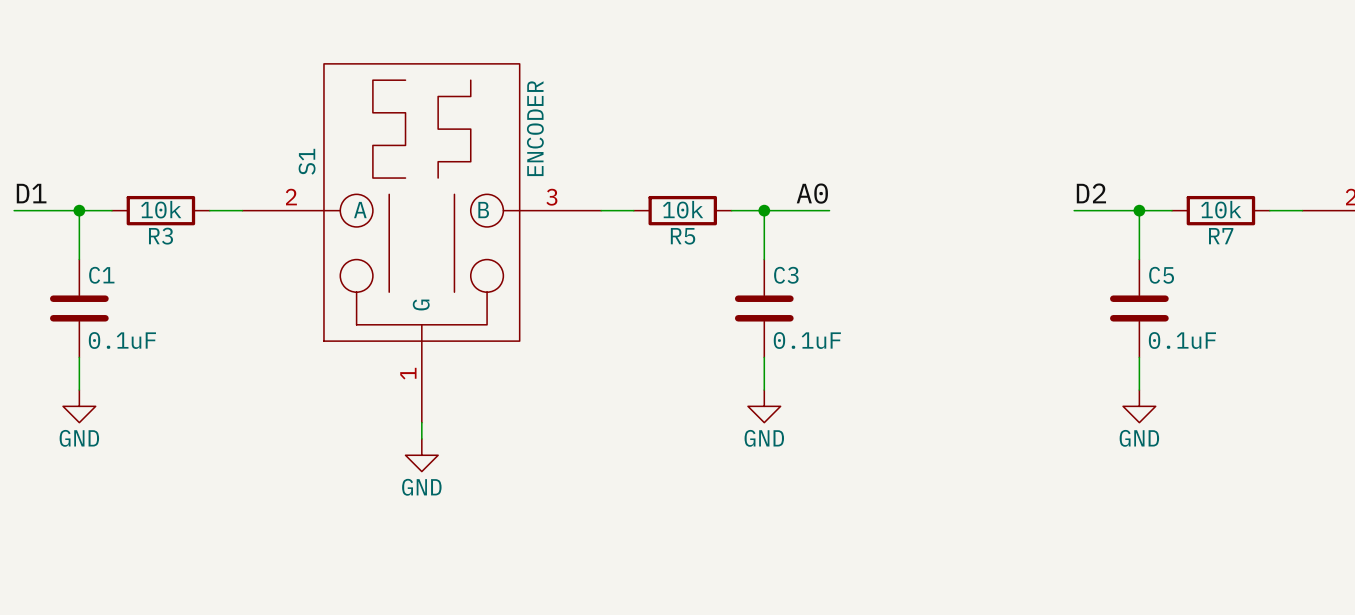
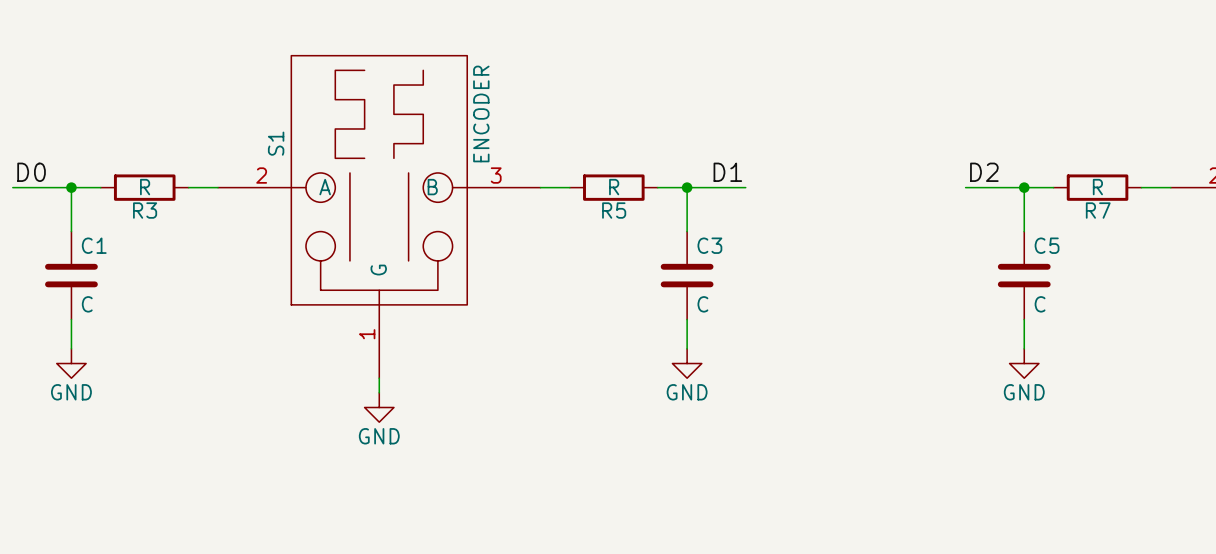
label: D1 (31, 193) -> D0 (31, 172)
label: A0 (812, 193) -> D1 (727, 172)
R3 value: 10k (161, 209) -> R (145, 187)
R5 value: 10k (683, 209) -> R (614, 187)
R7 value: 10k (1221, 209) -> R (1097, 187)
C1 value: 0.1uF (122, 340) -> C (87, 304)
C3 value: 0.1uF (807, 340) -> C (702, 304)
C5 value: 0.1uF (1182, 340) -> C (1040, 304)

